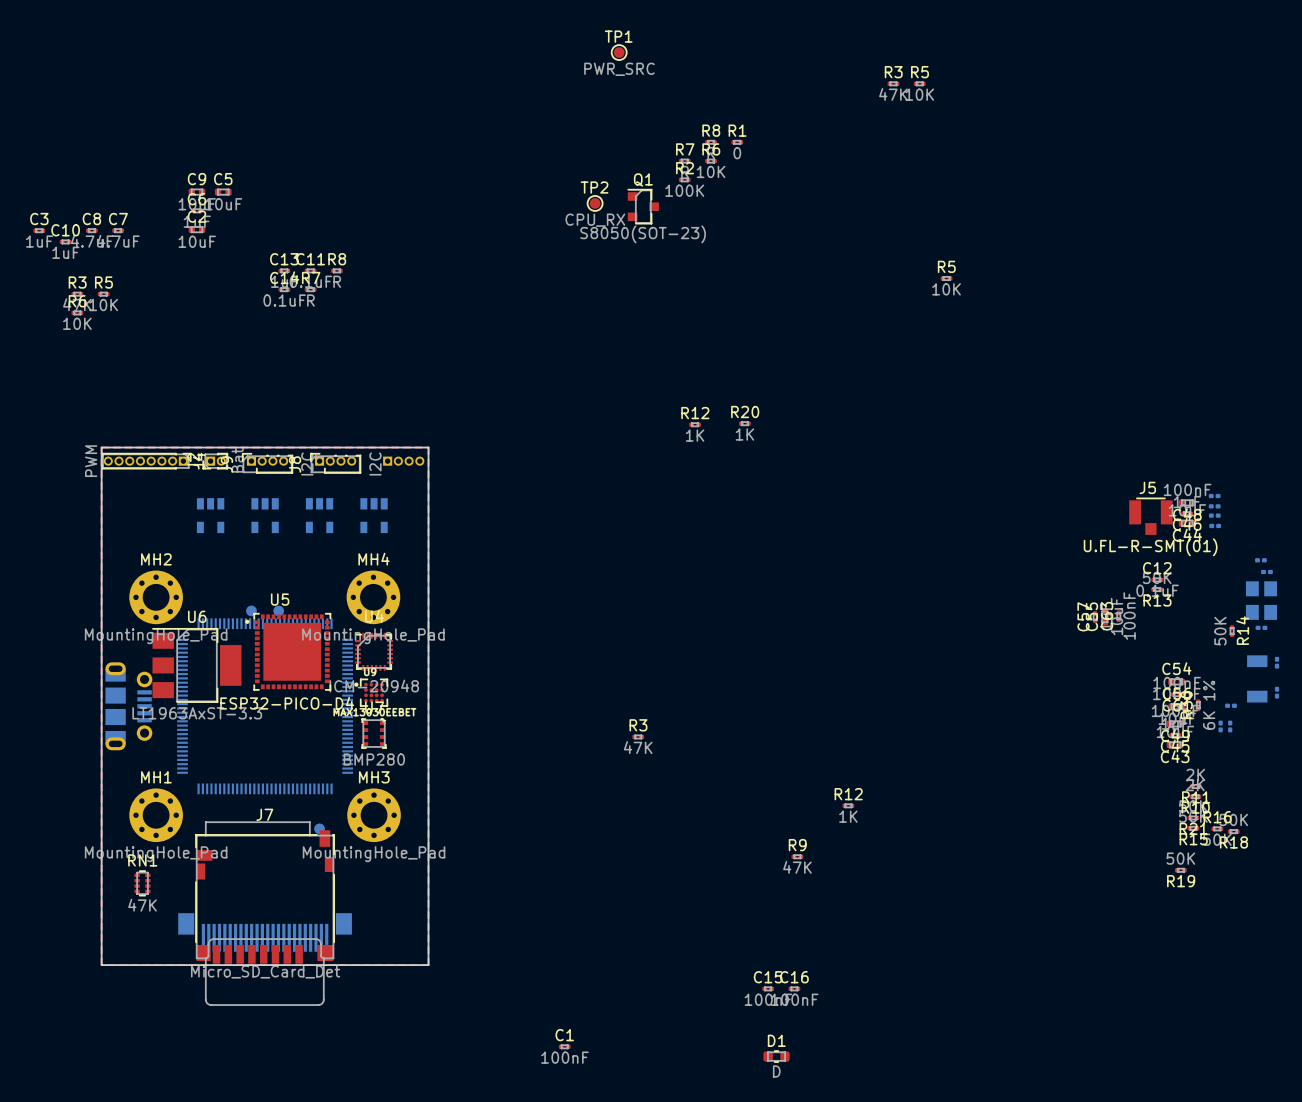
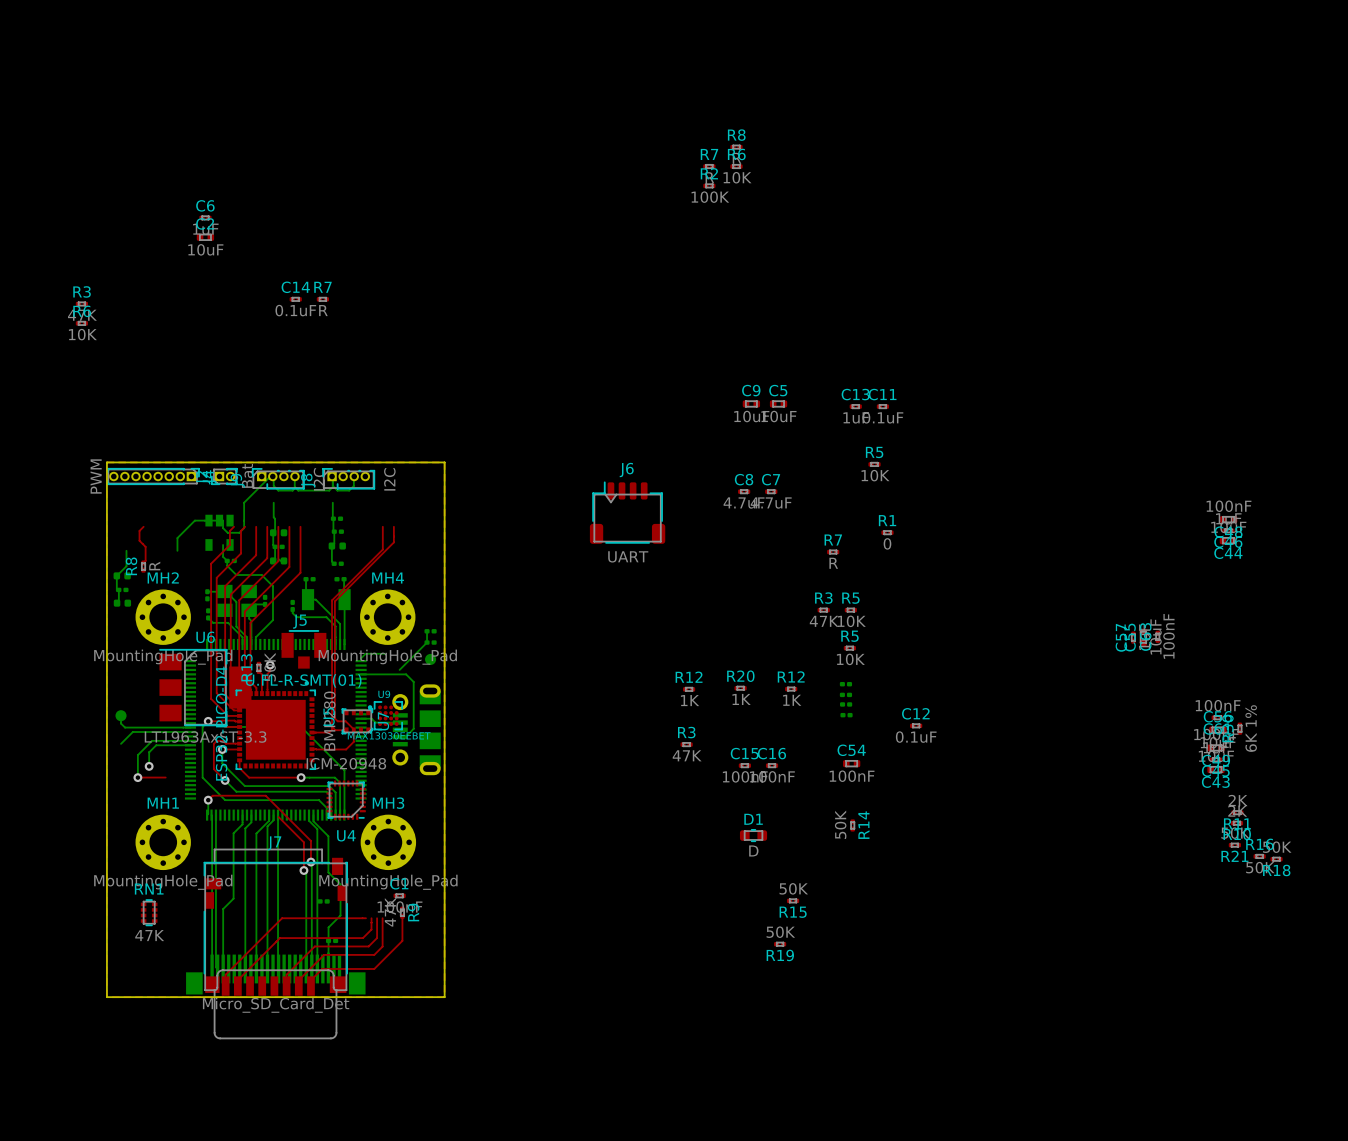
TP1: PWR_SRC (619, 52) -> none
R3: 47K (893, 83) -> none
R5: 10K (919, 83) -> none
R1 position: (737, 142) -> (887, 532)
C9 position: (196, 192) -> (751, 403)
C5 position: (223, 192) -> (778, 403)
TP2: CPU_RX (595, 203) -> none
Q1: S8050(SOT-23) (643, 206) -> none
C3: 1uF (39, 230) -> none
C8 position: (91, 230) -> (744, 491)
C7 position: (118, 230) -> (771, 491)
C10: 1uF (65, 241) -> none
C13 position: (284, 270) -> (855, 406)
C11 position: (310, 270) -> (882, 406)
R8: R (336, 270) -> none
R5: 10K (946, 278) -> none
R5: 10K (103, 294) -> none
R20 position: (744, 423) -> (740, 688)
R12: 1K (695, 424) -> none
R5: none -> 10K (874, 464)
part: (403, 461) -> none
bottom track: none -> (294, 478) (294, 487) (298, 490) (329, 490) (332, 487) (332, 478)
bottom track: none -> (353, 478) (353, 485) (349, 490) (337, 490) (332, 485)
bottom track: none -> (295, 487) (292, 490) (278, 490) (273, 485) (273, 478) (268, 478) (244, 502) (244, 528) (239, 532) (227, 532) (223, 528) (223, 520) (194, 520) (177, 538) (177, 550)
bottom track: none -> (273, 502) (275, 559) (273, 560)
bottom track: none -> (332, 502) (334, 543) (331, 546) (331, 561) (334, 563)
J6: none -> UART (627, 512)
part: (1214, 496) -> none
part footprint: [251, 498, 279, 534] -> [269, 529, 288, 537]
part footprint: [305, 498, 334, 534] -> [331, 529, 344, 534]
part: none -> (336, 518)
part: (1214, 506) -> none
top track: none -> (143, 526) (139, 530) (139, 540) (145, 546) (145, 560) (143, 563)
top track: none -> (234, 526) (229, 530) (229, 544) (211, 563) (211, 698) (228, 715) (239, 715)
top track: none -> (245, 526) (241, 530) (241, 553) (216, 577) (216, 693) (233, 710) (239, 710)
top track: none -> (256, 526) (256, 555) (225, 586) (225, 694) (235, 704) (239, 704)
top track: none -> (267, 526) (267, 558) (230, 594) (230, 691) (239, 699)
top track: none -> (278, 526) (278, 561) (239, 600) (239, 683) (245, 689) (245, 693)
top track: none -> (289, 526) (289, 567) (244, 611) (244, 683) (250, 689) (250, 693)
top track: none -> (300, 526) (300, 572) (250, 622) (250, 681) (256, 687) (256, 693)
top track: none -> (382, 526) (382, 549) (332, 600) (332, 729) (329, 732) (311, 732)
top track: none -> (393, 526) (393, 542) (334, 601) (334, 718) (337, 721) (345, 721) (353, 729) (353, 741) (346, 749) (311, 749)
part: (374, 515) -> none
part: (1214, 515) -> none
J5 position: (1150, 516) -> (303, 649)
part: (1215, 525) -> none
bottom track: none -> (223, 544) (223, 556) (227, 560) (227, 565) (236, 575) (261, 575) (272, 586) (272, 620) (255, 637) (255, 644)
part: none -> (337, 546)
part: none -> (278, 546)
bottom track: none -> (126, 550) (126, 566) (116, 575) (116, 590) (118, 589) (118, 601) (117, 603)
R7: none -> R (833, 552)
bottom track: none -> (279, 559) (280, 560)
part: none -> (230, 560)
part: none -> (278, 560)
part: none -> (337, 563)
R8: none -> R (143, 566)
part: none -> (122, 575)
bottom track: none -> (306, 579) (306, 597) (308, 599) (315, 599) (340, 623) (340, 644)
part: none -> (309, 579)
part: none -> (340, 579)
bottom track: none -> (344, 579) (344, 644)
part: (1260, 560) -> none
part: none -> (122, 589)
bottom track: none -> (207, 591) (225, 591) (236, 601) (236, 626) (246, 637) (246, 644)
part: (1266, 572) -> none
part: none -> (207, 595)
C12 position: (1157, 579) -> (916, 725)
part: none -> (326, 599)
part: none -> (236, 600)
part: none -> (265, 600)
part: none -> (122, 603)
bottom track: none -> (265, 604) (255, 604) (249, 610) (249, 618) (251, 620) (251, 644)
part: none -> (292, 605)
bottom track: none -> (292, 609) (292, 613) (296, 617) (326, 617) (335, 626) (335, 644)
R13 rotation: 0° (1157, 589) -> 90° clockwise (258, 667)
R13 position: (1157, 589) -> (258, 667)
R3: none -> 47K (823, 610)
R5: none -> 10K (850, 610)
part: none -> (208, 614)
bottom track: none -> (208, 617) (213, 622) (228, 622) (242, 637) (242, 644)
part: (1261, 600) -> none
part: (251, 610) -> none
part: (278, 610) -> none
bottom track: none -> (427, 631) (427, 642) (399, 669)
part: none -> (430, 631)
part: none -> (430, 642)
R5: none -> 10K (849, 648)
part: (1261, 627) -> none
R14 position: (1232, 631) -> (852, 825)
bottom track: none -> (384, 653) (365, 653) (361, 661)
part: none -> (430, 659)
top track: none -> (270, 665) (270, 671) (267, 674) (267, 693)
via: none -> (270, 665)
top track: none -> (258, 671) (261, 674) (261, 693)
U5 rotation: 0° (288, 651) -> 90° clockwise (275, 725)
U5 position: (288, 651) -> (275, 725)
U4 rotation: 0° (374, 651) -> 180° (346, 800)
U4 position: (374, 651) -> (346, 800)
bottom track: none -> (361, 674) (406, 674) (413, 681) (413, 728) (405, 736) (400, 736)
part: none -> (845, 684)
part: (1277, 662) -> none
R12: none -> 1K (791, 689)
R12: none -> 1K (689, 689)
part: none -> (845, 694)
part: (1257, 678) -> none
part: none -> (846, 704)
C54 position: (1176, 681) -> (851, 763)
bottom track: none -> (121, 715) (121, 723) (125, 727) (190, 727)
part: none -> (121, 715)
part: none -> (846, 715)
part: (1277, 692) -> none
bottom track: none -> (361, 718) (371, 718) (375, 722) (400, 722)
bottom track: none -> (208, 721) (202, 726) (202, 777) (225, 800) (319, 800) (326, 807) (326, 815)
top track: none -> (208, 721) (239, 721)
via: none -> (208, 721)
bottom track: none -> (225, 726) (301, 726) (344, 770) (344, 815)
top track: none -> (225, 726) (239, 726)
top track: none -> (332, 726) (335, 730) (346, 730)
part: (1230, 705) -> none
part: (128, 706) -> none
part: none -> (416, 729)
bottom track: none -> (190, 732) (132, 732) (121, 743)
bottom track: none -> (190, 740) (152, 740) (137, 755) (137, 777)
top track: none -> (239, 743) (225, 743) (223, 741) (216, 741) (213, 743) (213, 769) (225, 780)
bottom track: none -> (190, 745) (156, 745) (149, 752)
bottom track: none -> (222, 749) (222, 763) (244, 786) (329, 786) (335, 792) (335, 815)
via: none -> (222, 749)
top track: none -> (239, 749) (222, 749)
part: (1220, 726) -> none
part: (1230, 726) -> none
bottom track: none -> (149, 752) (149, 766)
U7 rotation: 0° (374, 733) -> 90° clockwise (357, 721)
U7 position: (374, 733) -> (357, 721)
top track: none -> (239, 760) (239, 768) (249, 777) (301, 777)
R3 position: (638, 736) -> (686, 744)
via: none -> (149, 766)
top track: none -> (137, 777) (165, 777)
via: none -> (137, 777)
bottom track: none -> (301, 777) (334, 777) (340, 782) (340, 815)
via: none -> (301, 777)
bottom track: none -> (225, 780) (236, 791) (326, 791) (331, 796) (331, 815)
via: none -> (225, 780)
bottom track: none -> (208, 800) (207, 815)
top track: none -> (208, 800) (212, 795) (265, 795) (310, 840) (310, 862)
via: none -> (208, 800)
bottom track: none -> (211, 815) (212, 968)
bottom track: none -> (215, 815) (215, 967) (217, 968)
bottom track: none -> (242, 815) (242, 824) (233, 833) (233, 898) (223, 909) (223, 968)
bottom track: none -> (251, 815) (251, 822) (245, 828) (245, 968)
bottom track: none -> (269, 815) (269, 820) (256, 833) (256, 968)
bottom track: none -> (273, 815) (273, 820) (267, 826) (267, 968)
bottom track: none -> (278, 815) (278, 968)
bottom track: none -> (309, 815) (309, 820) (317, 829) (317, 968)
bottom track: none -> (313, 815) (313, 821) (328, 836) (328, 872) (340, 884) (340, 915) (328, 927) (328, 953)
top track: none -> (278, 817) (303, 842) (303, 870)
R12: 1K (848, 805) -> none
part: (319, 828) -> none
R15 position: (1193, 828) -> (793, 900)
bottom track: none -> (310, 862) (311, 968)
via: none -> (310, 862)
bottom track: none -> (303, 870) (306, 872) (306, 968)
via: none -> (303, 870)
R9 rotation: 0° (797, 856) -> 90° clockwise (402, 912)
R9 position: (797, 856) -> (402, 912)
R19 position: (1180, 870) -> (780, 944)
part: none -> (323, 901)
top track: none -> (402, 916) (402, 940) (374, 968) (322, 968) (310, 980) (310, 986)
top track: none -> (365, 918) (282, 918) (225, 974) (225, 986)
top track: none -> (371, 918) (371, 929) (362, 938) (280, 938) (237, 980) (237, 986)
top track: none -> (377, 918) (377, 938) (368, 946) (314, 946) (286, 974) (286, 986)
top track: none -> (382, 918) (382, 946) (374, 954) (324, 954) (298, 980) (298, 986)
part: none -> (332, 940)
part rotation: 0° (265, 932) -> 180° (275, 974)
C15 position: (768, 988) -> (744, 765)
C16 position: (794, 988) -> (772, 765)
C1 position: (564, 1046) -> (399, 895)
D1 position: (776, 1056) -> (753, 835)

